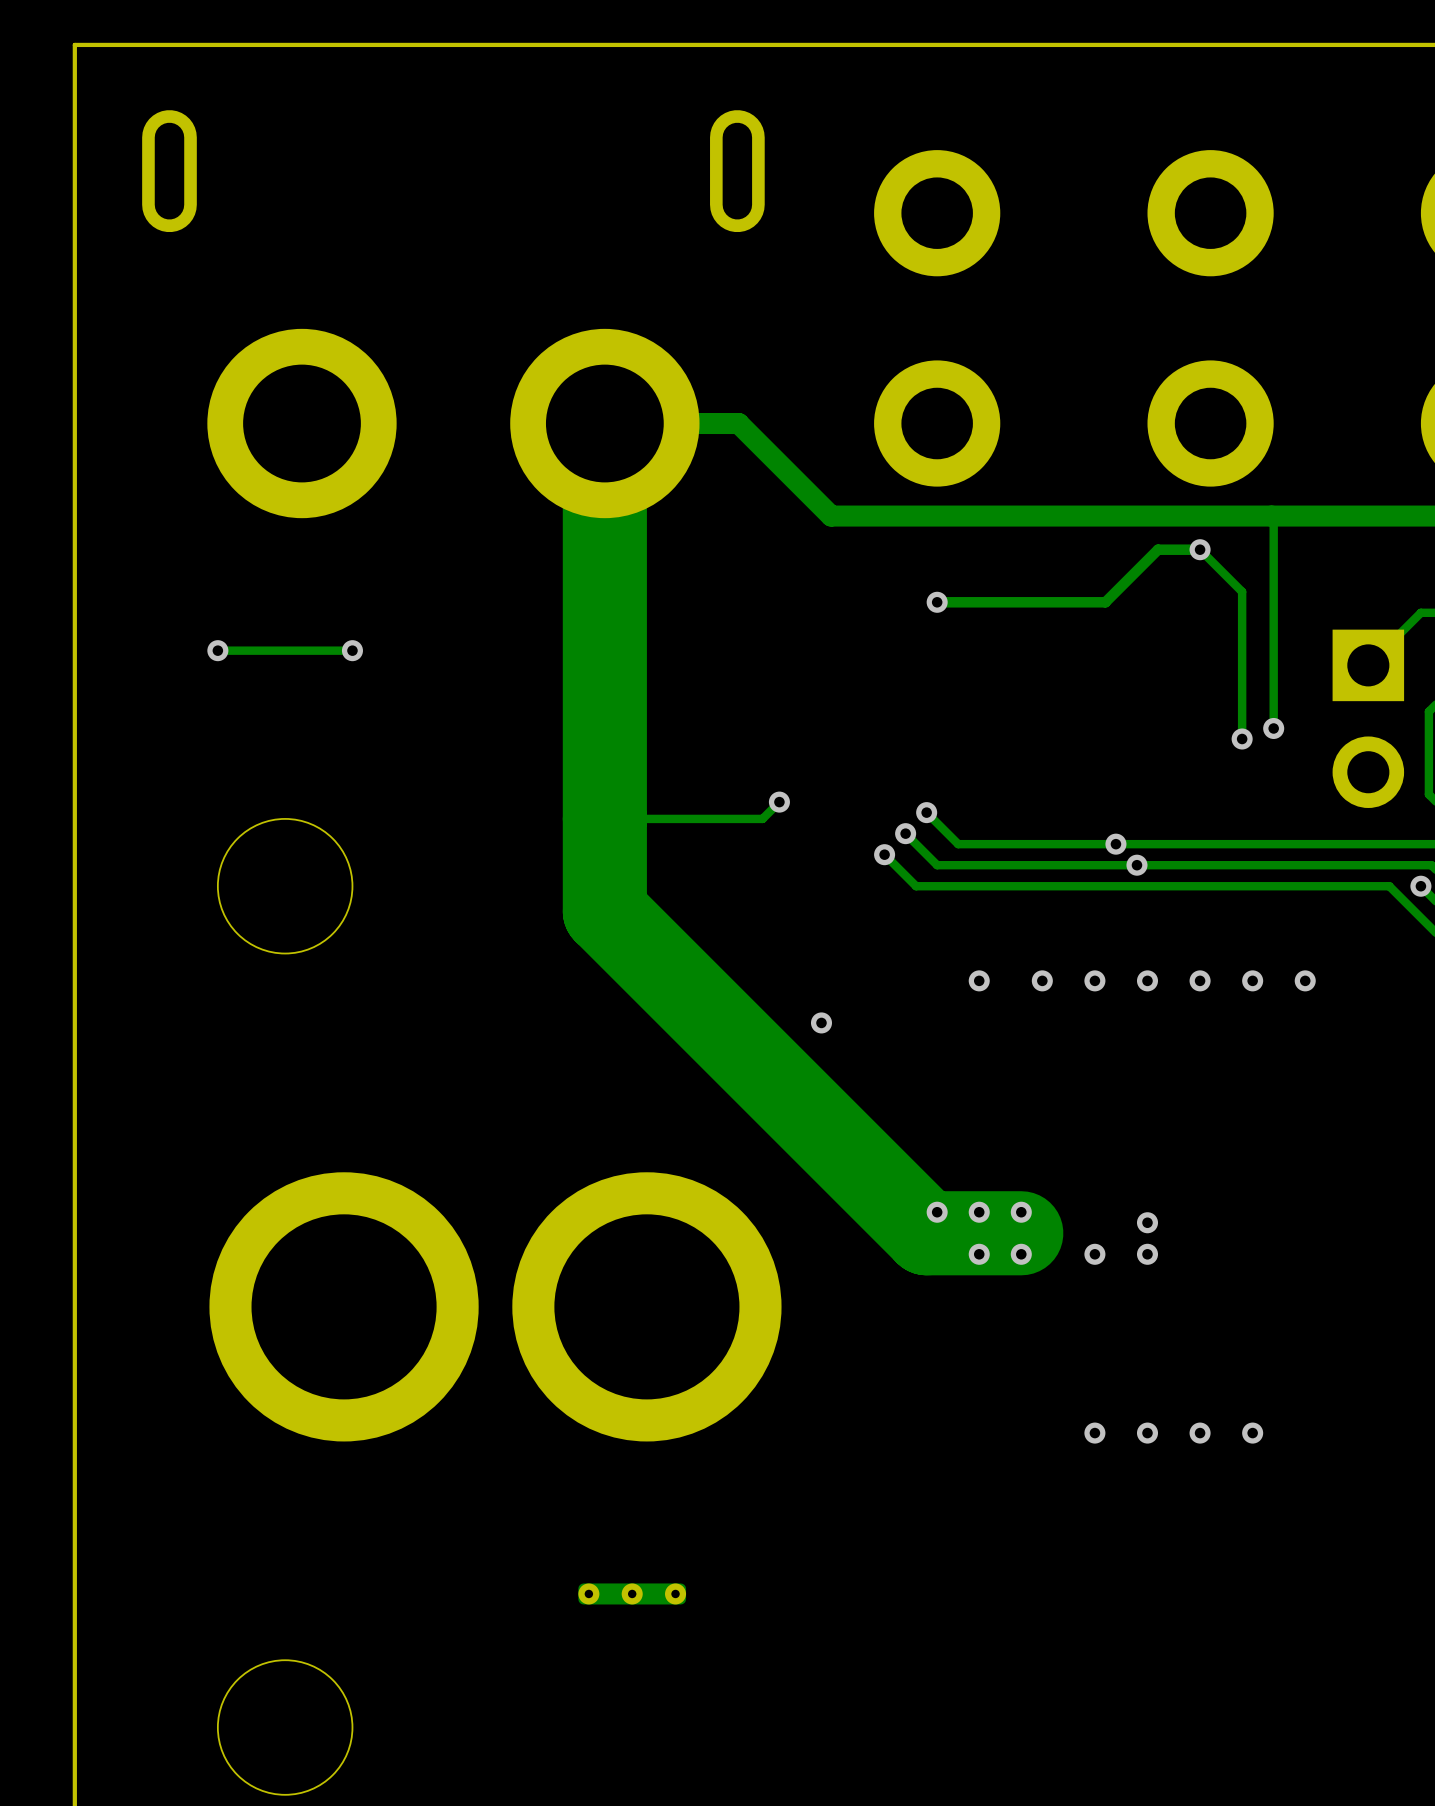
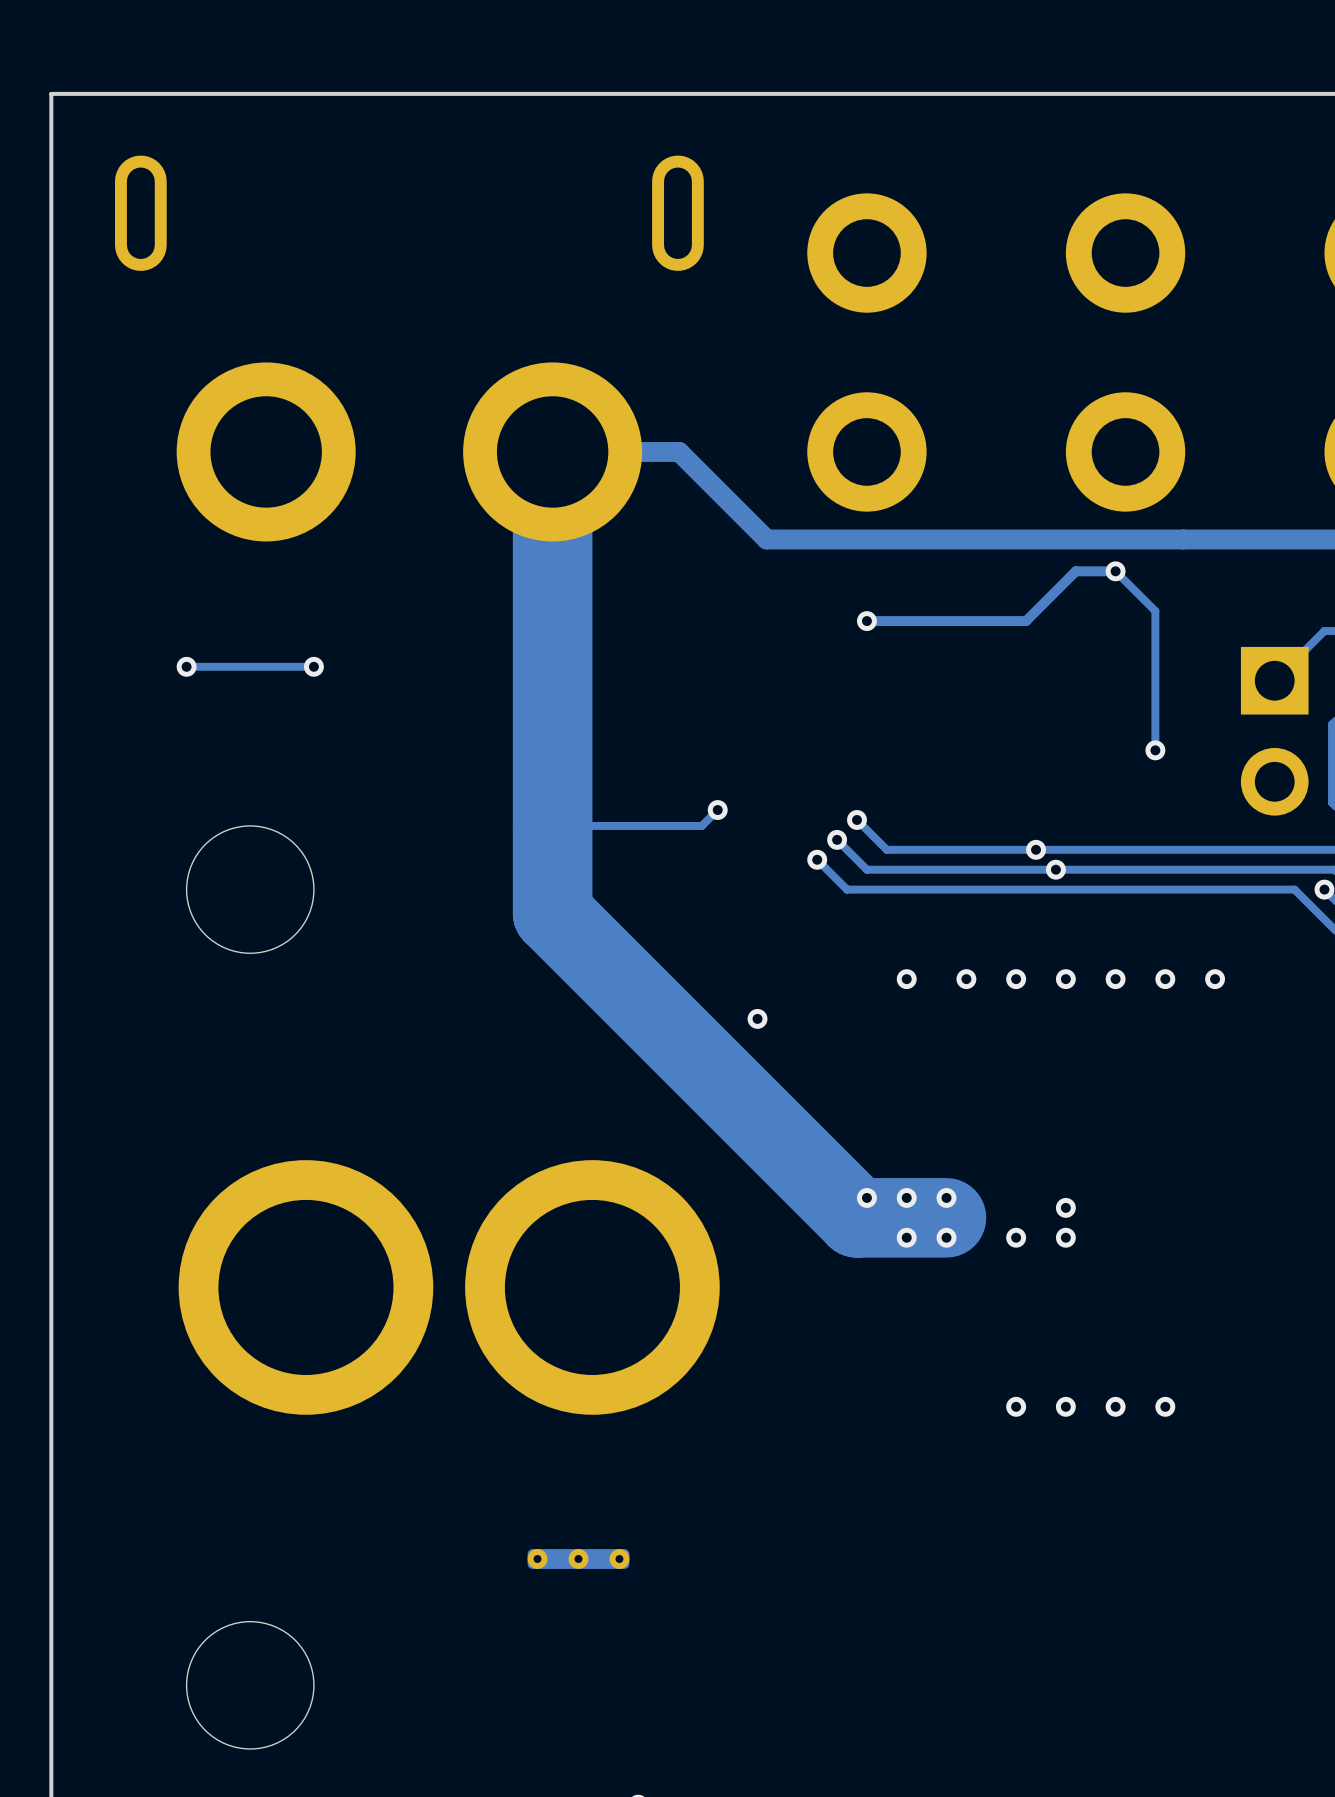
track: (1273, 518) (1273, 728) -> none
via: (1273, 728) -> none

